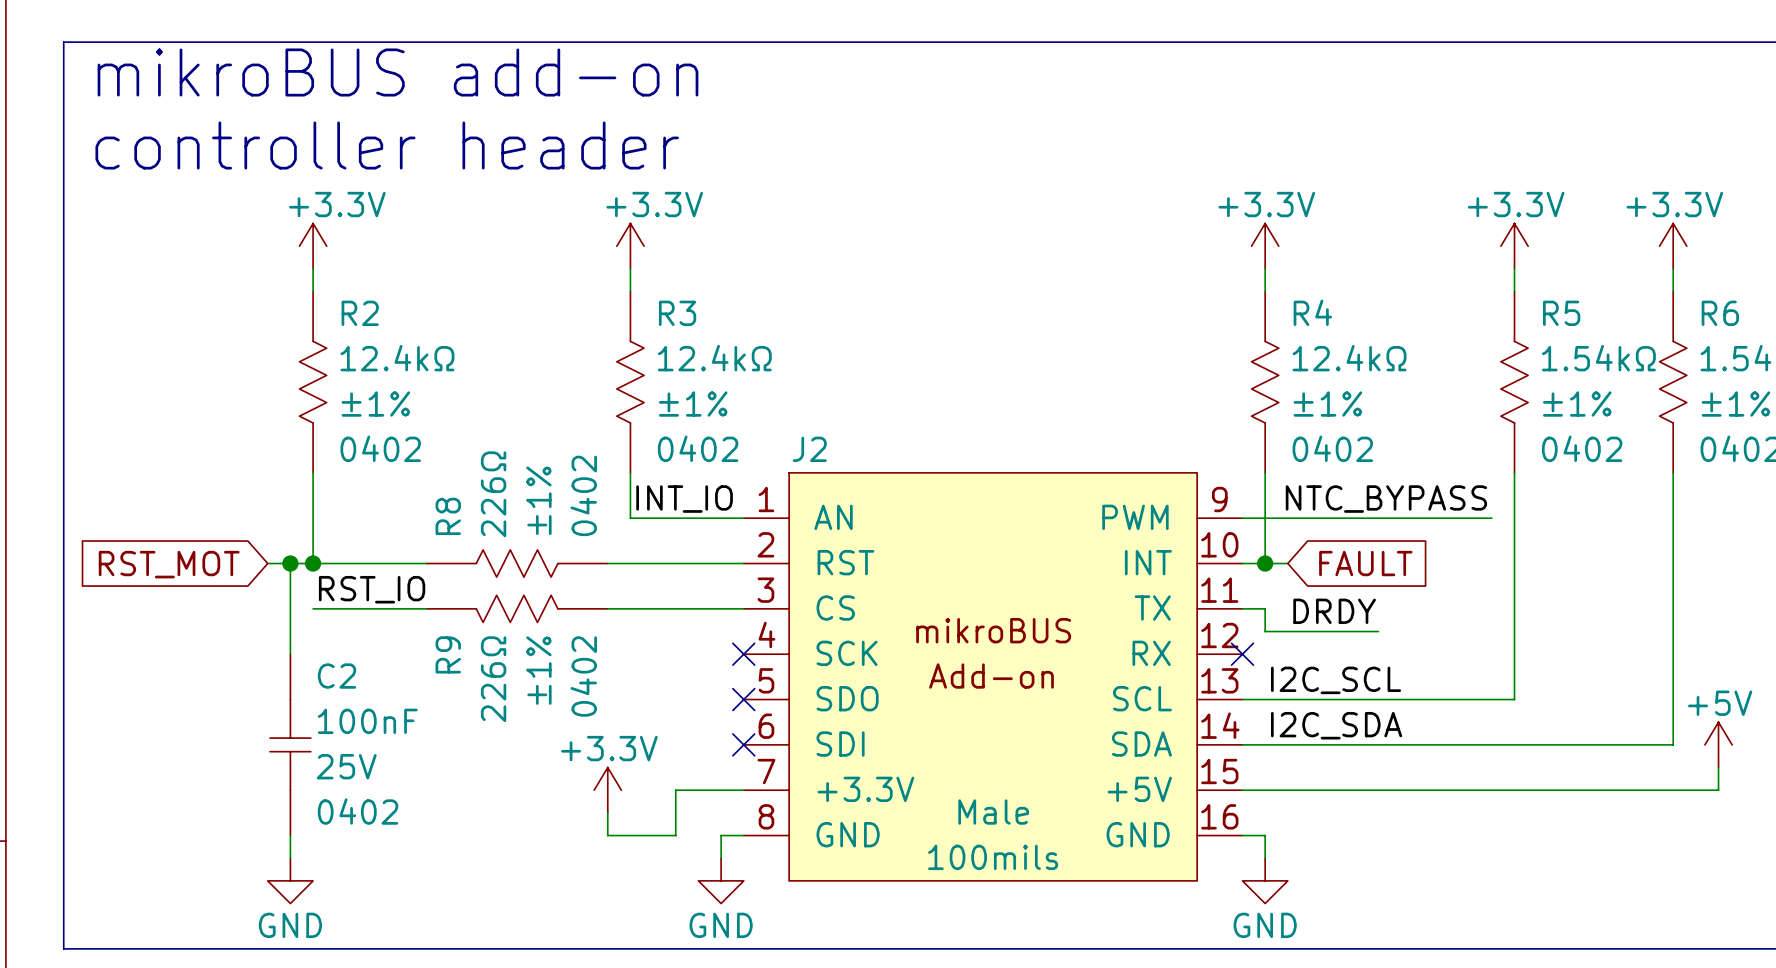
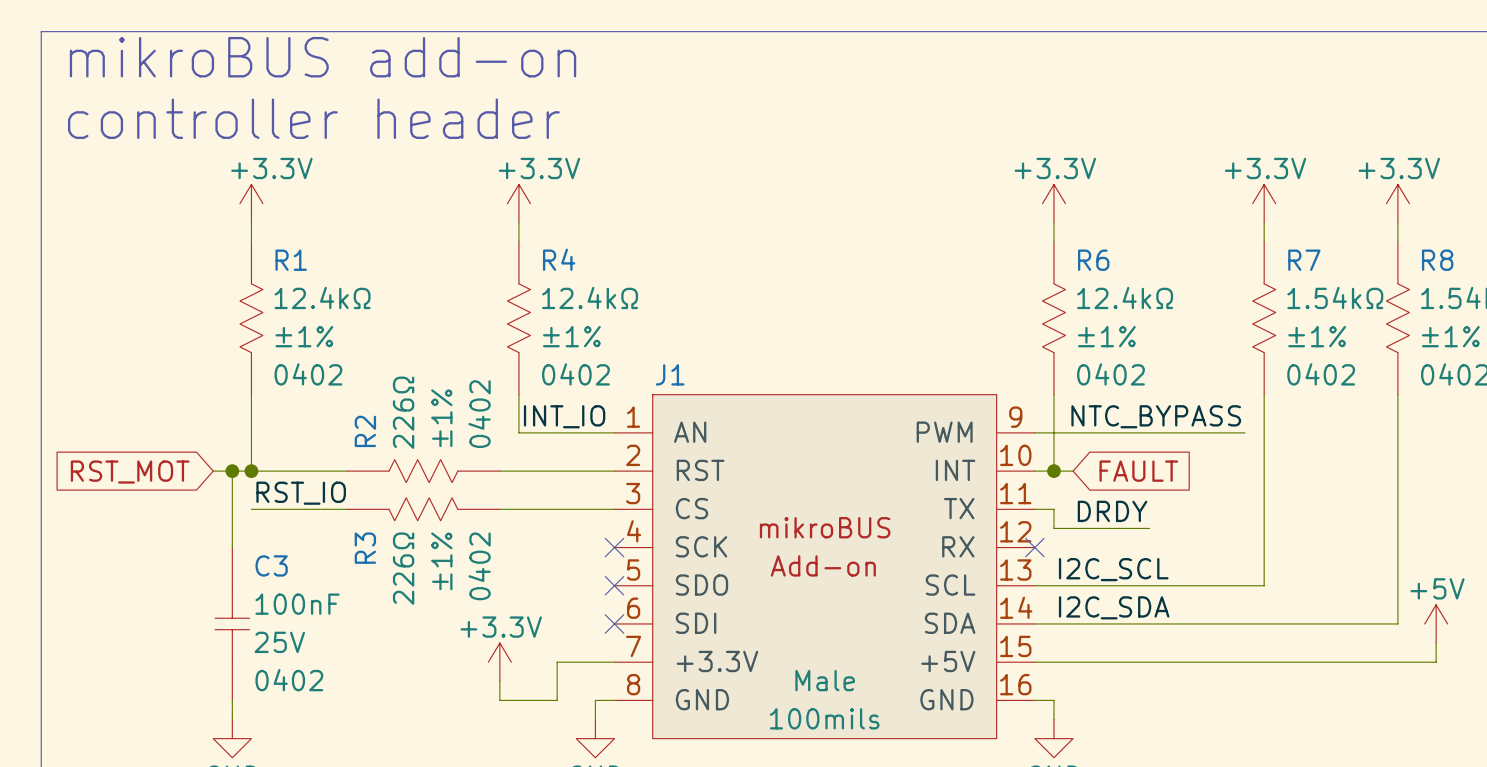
R4 name: R4 (1312, 312) -> R6 (1093, 260)
R2 name: R2 (360, 313) -> R1 (291, 260)
R3 name: R3 (677, 313) -> R4 (559, 259)
R5 name: R5 (1561, 313) -> R7 (1304, 260)
R6 name: R6 (1720, 313) -> R8 (1437, 260)
J2 name: J2 (809, 449) -> J1 (670, 374)
R8 name: R8 (448, 516) -> R2 (365, 431)
R9 name: R9 (448, 654) -> R3 (365, 548)
C2 name: C2 (336, 676) -> C3 (271, 565)

